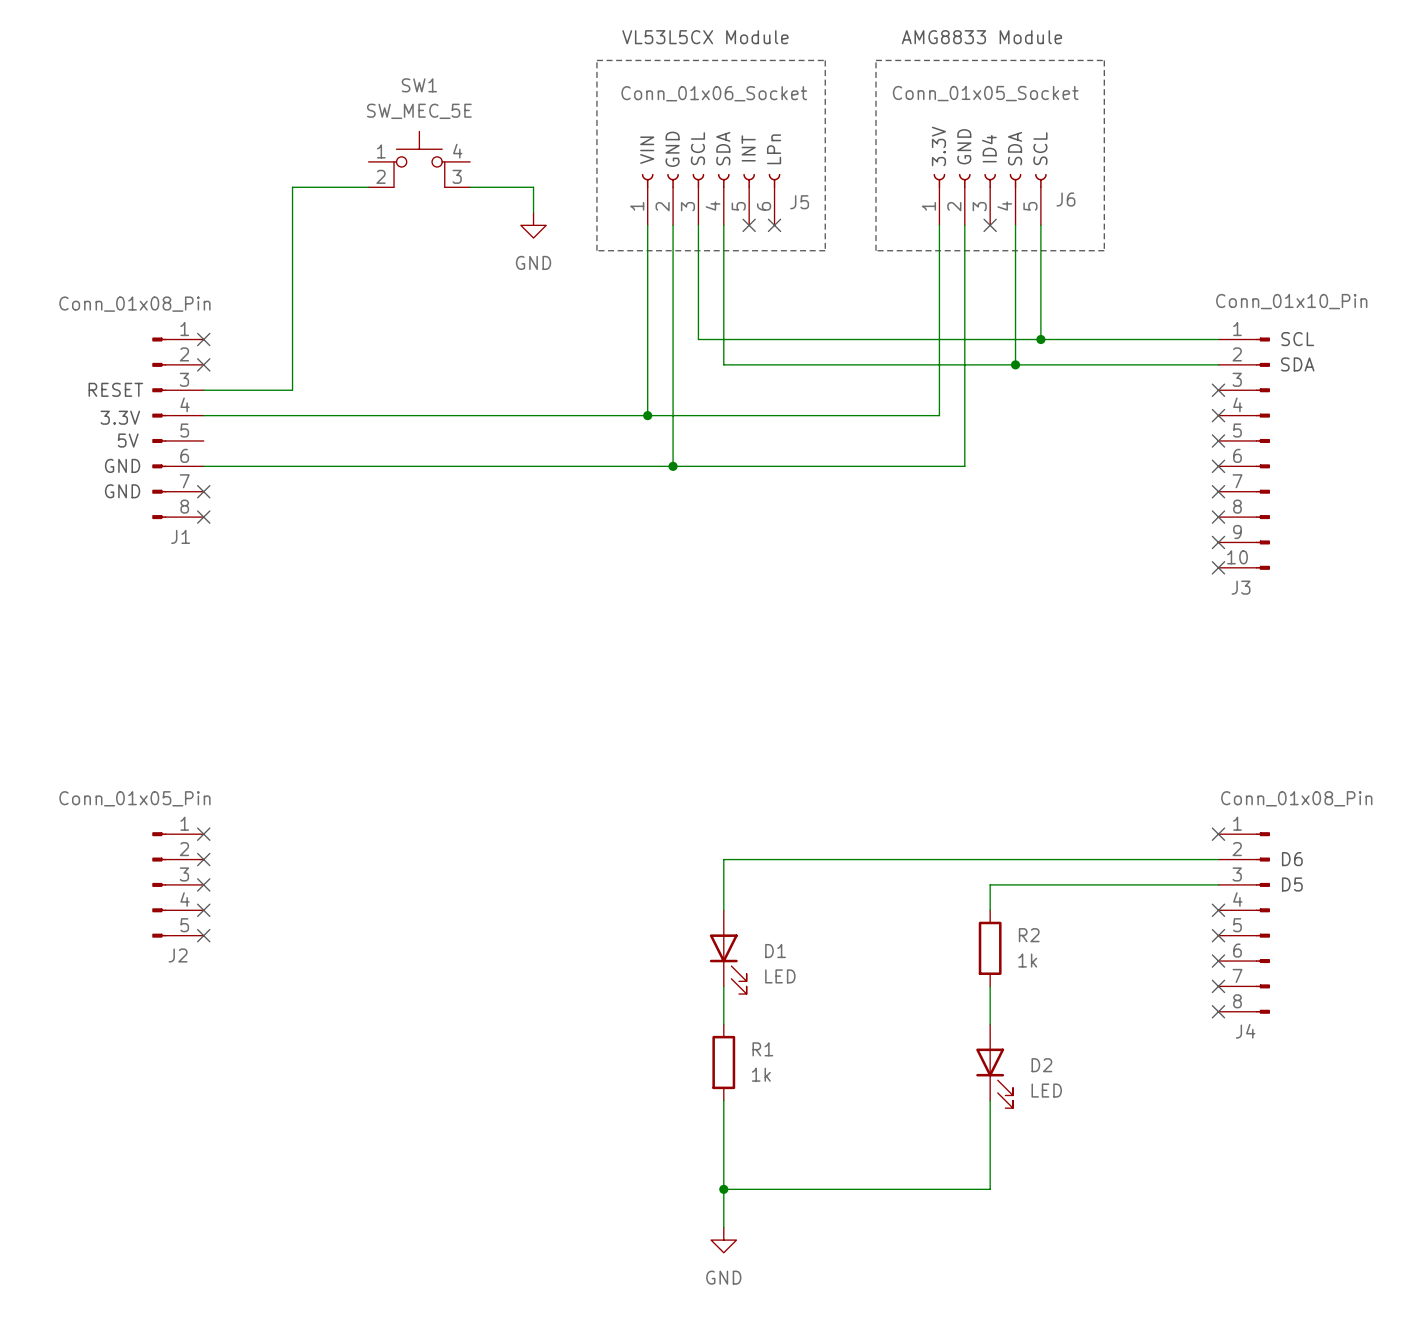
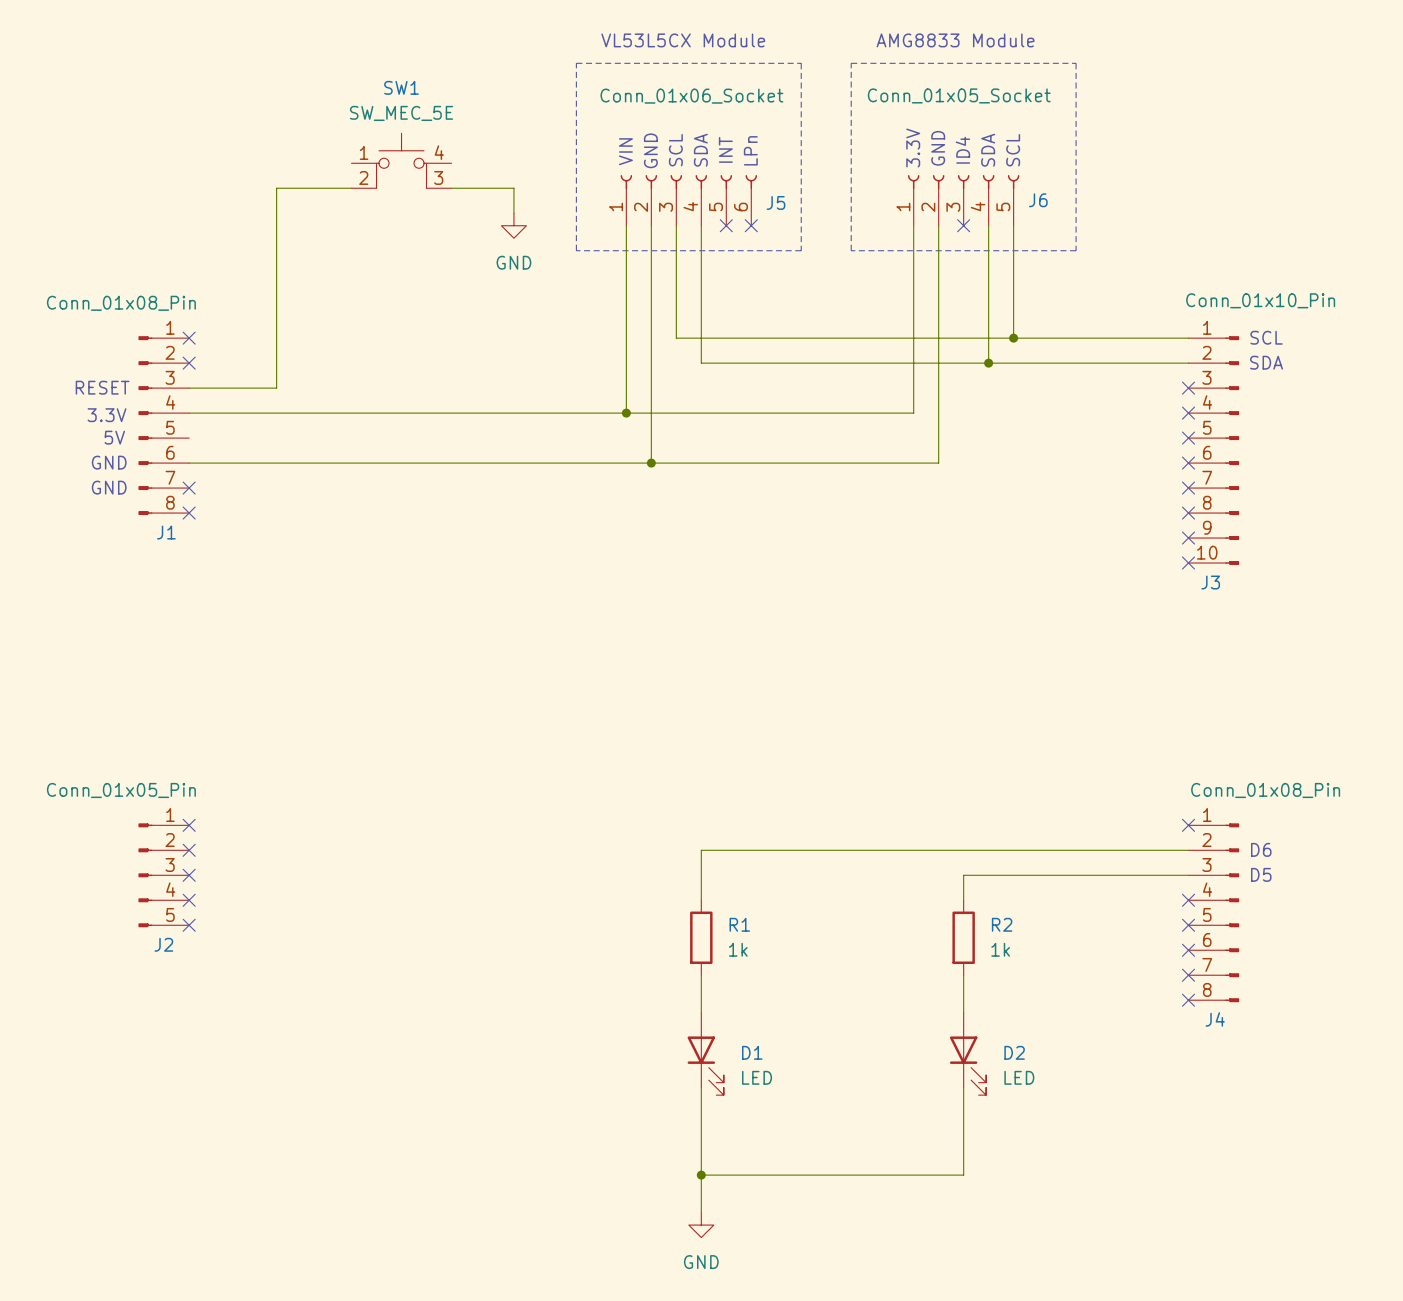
D1 position: (728, 952) -> (705, 1053)
R1 position: (723, 1062) -> (701, 937)

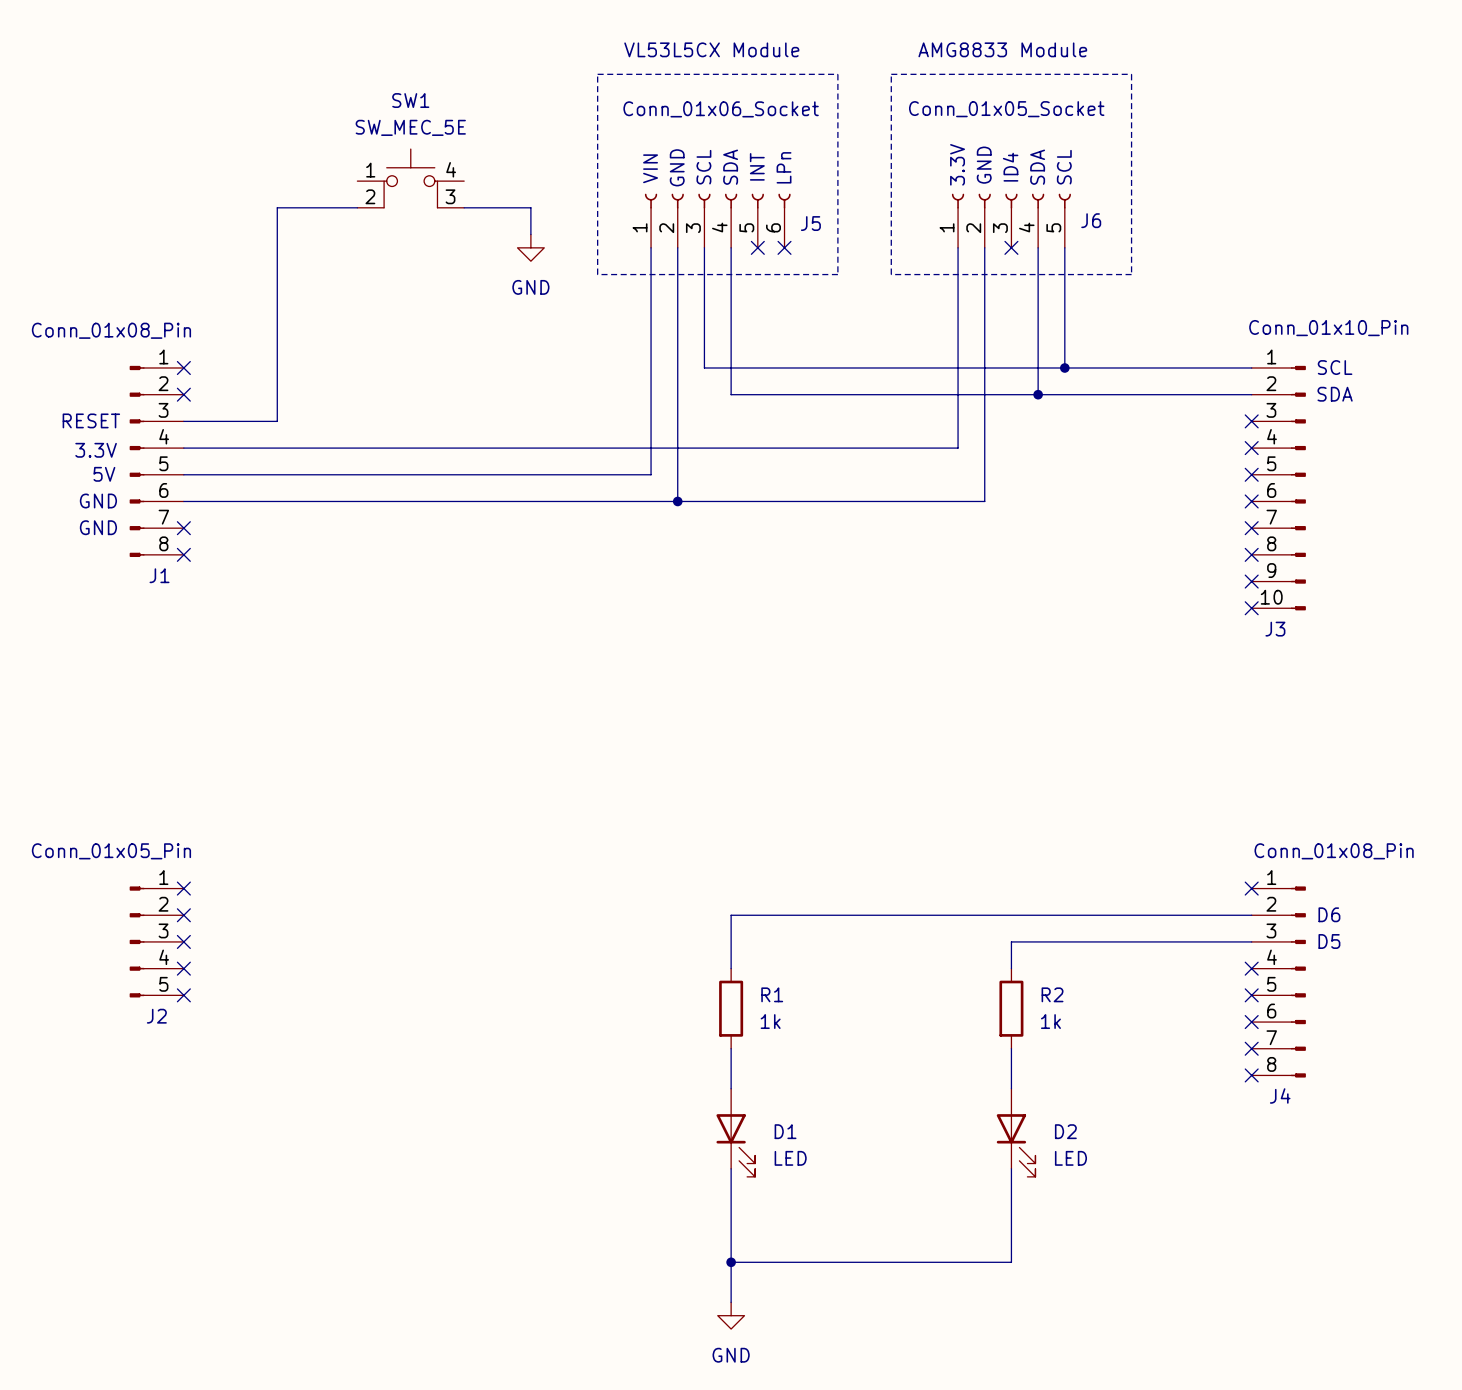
wire: none -> (651, 448) (651, 474) (183, 474)
junction: (626, 413) -> none

